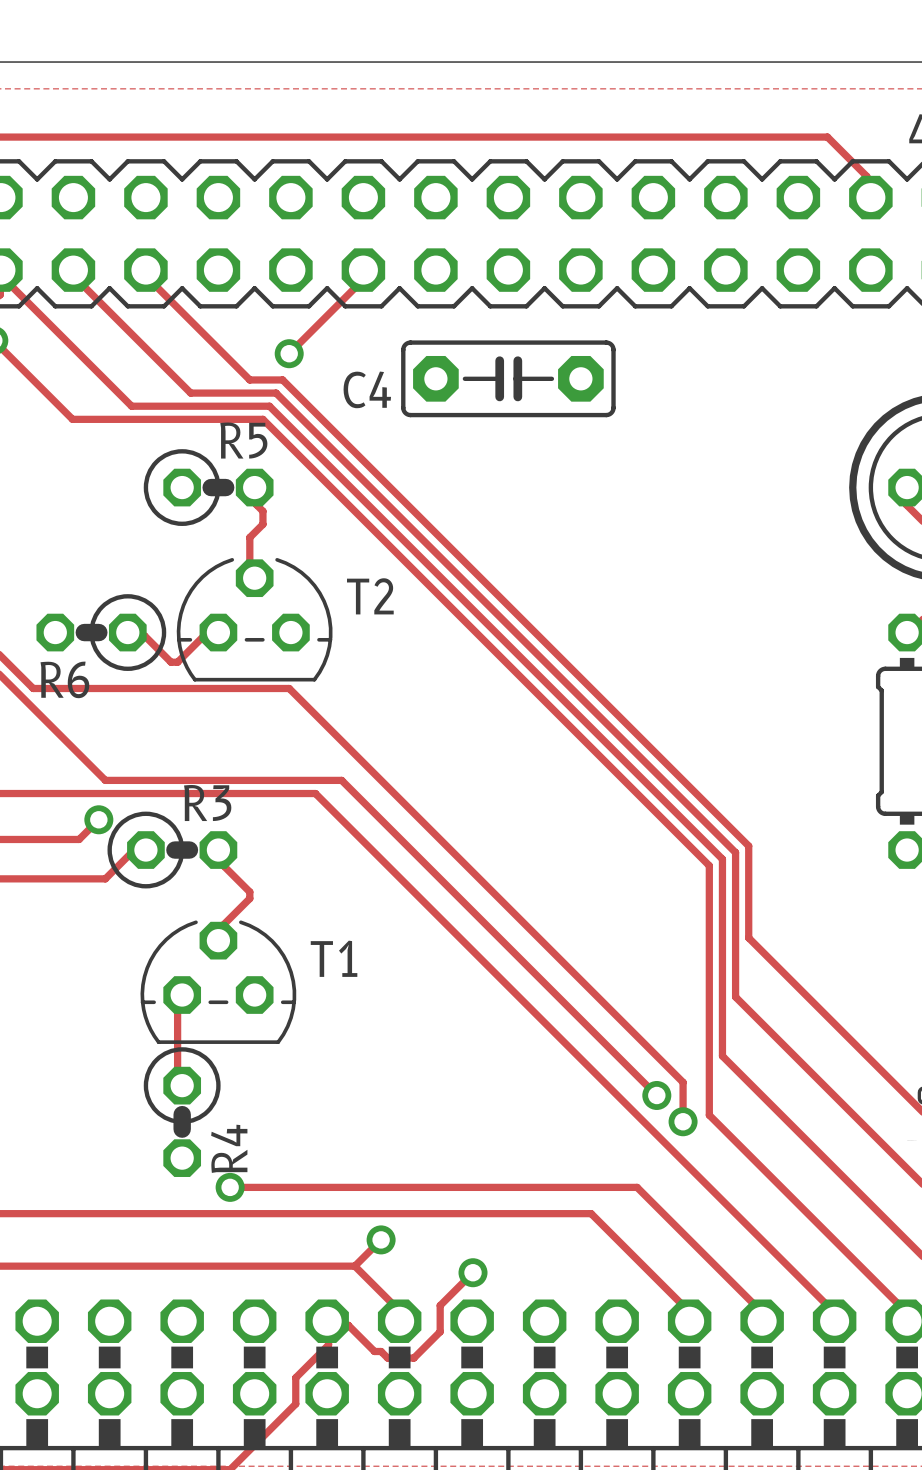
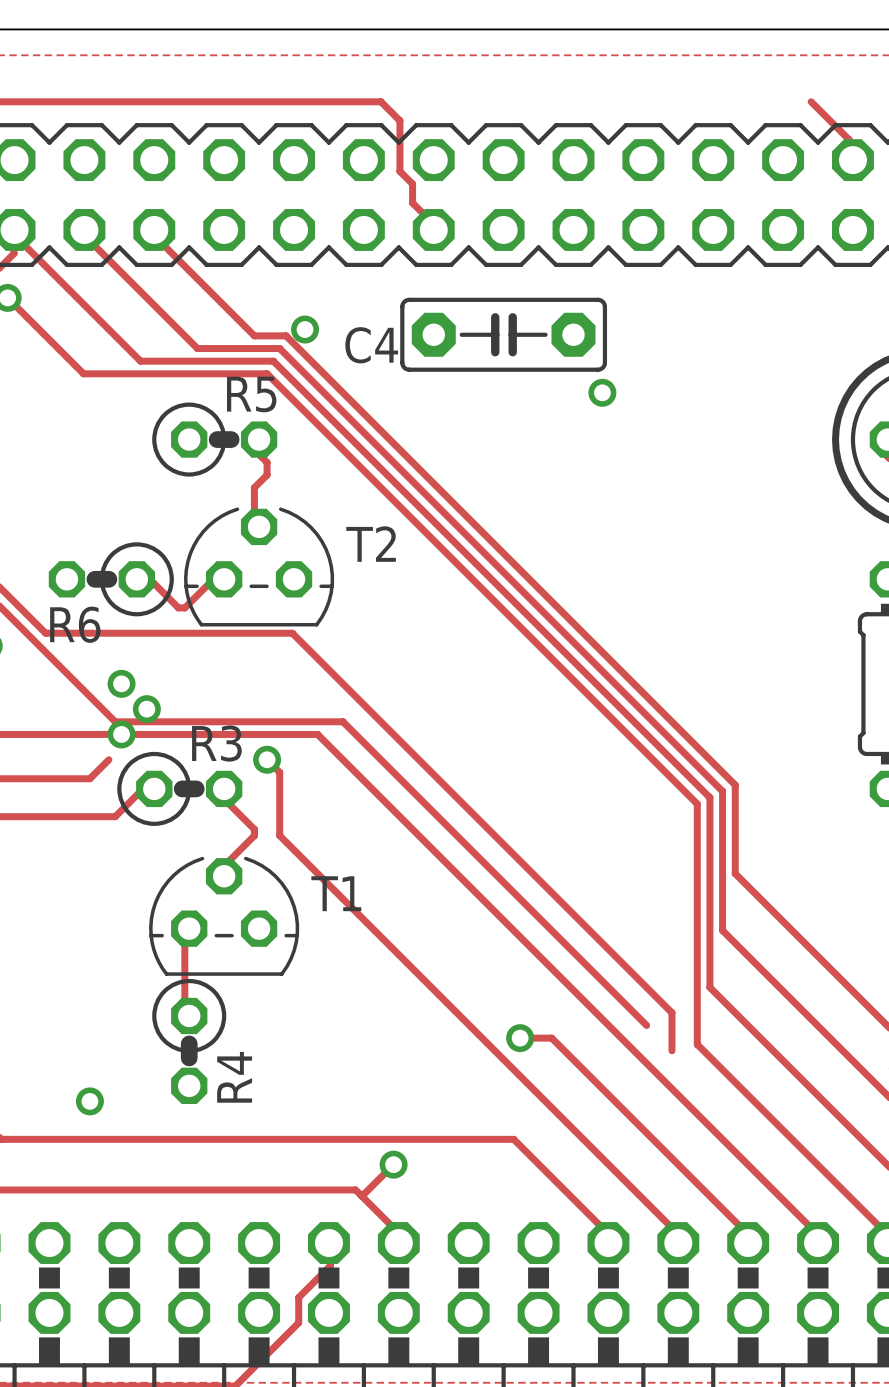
track: (381, 137) (827, 137) -> (380, 101) (399, 120) (399, 171) (412, 184) (412, 203) (437, 228) (433, 229)
track: (363, 270) (367, 274) (289, 353) -> none
via position: (289, 353) -> (305, 329)
via: none -> (602, 392)
via: none -> (121, 683)
via: none -> (146, 709)
via position: (98, 819) -> (121, 734)
track: none -> (267, 759) (279, 772) (279, 835) (583, 1139)
via: none -> (267, 759)
via: (656, 1095) -> none
via: none -> (520, 1038)
via: (683, 1121) -> none
via: none -> (89, 1101)
track: (230, 1187) (637, 1187) -> (520, 1038) (551, 1038) (627, 1114)
via: (230, 1187) -> none
track: (518, 1213) (591, 1213) -> (513, 1139) (602, 1227) (602, 1240) (608, 1243)
track: (381, 1239) (354, 1266) -> none
via position: (381, 1239) -> (393, 1164)
track: none -> (393, 1164) (361, 1196)
track: (473, 1272) (440, 1305) (440, 1331) (413, 1358) (387, 1358) (381, 1351) (374, 1351) (348, 1325) (328, 1325) -> none
via: (473, 1272) -> none

